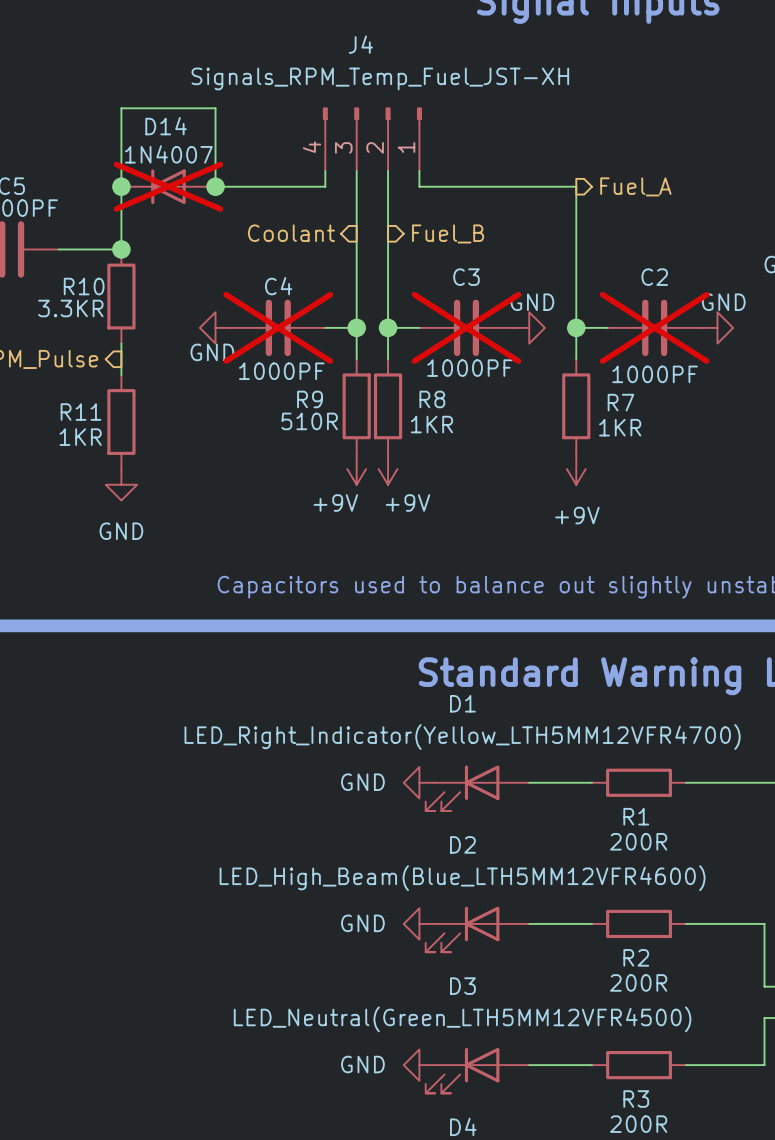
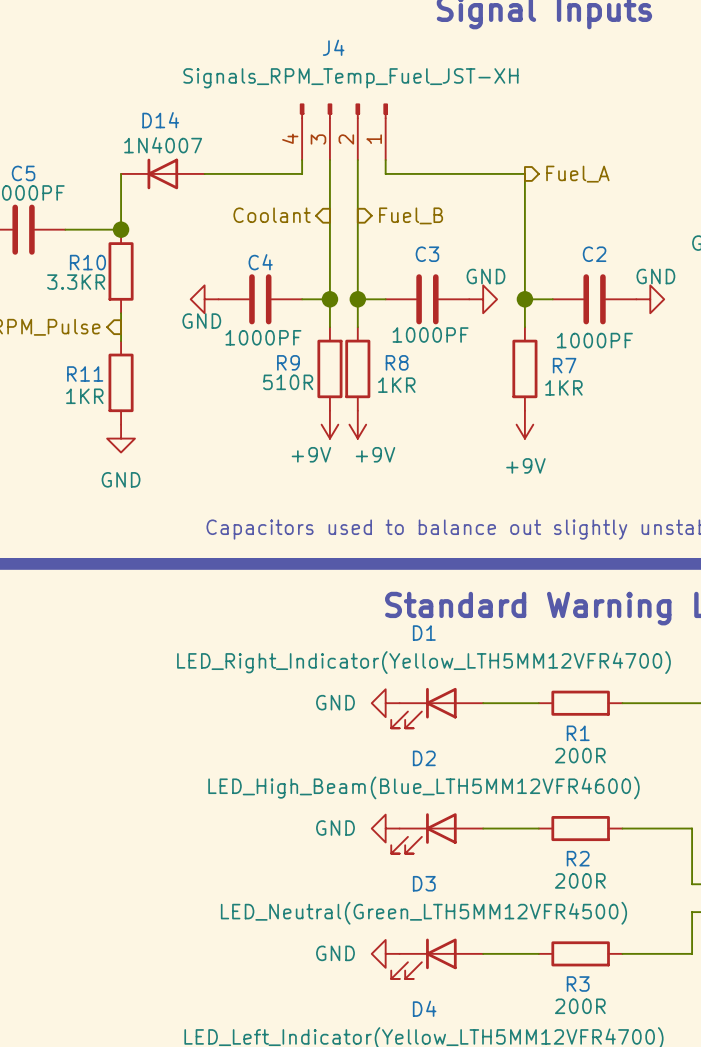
wire: (121, 186) (121, 108) (215, 108) (215, 186) -> none
junction: (121, 186) -> none
D14 do-not-place cross: (168, 186) -> none
junction: (215, 186) -> none
C4 do-not-place cross: (278, 327) -> none
C3 do-not-place cross: (466, 327) -> none
C2 do-not-place cross: (654, 327) -> none

